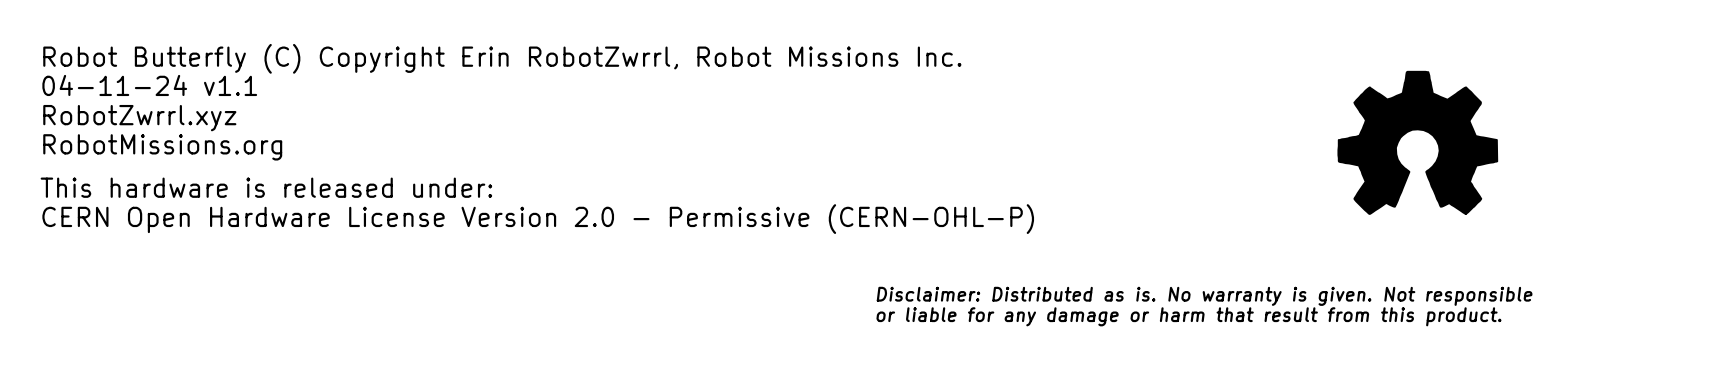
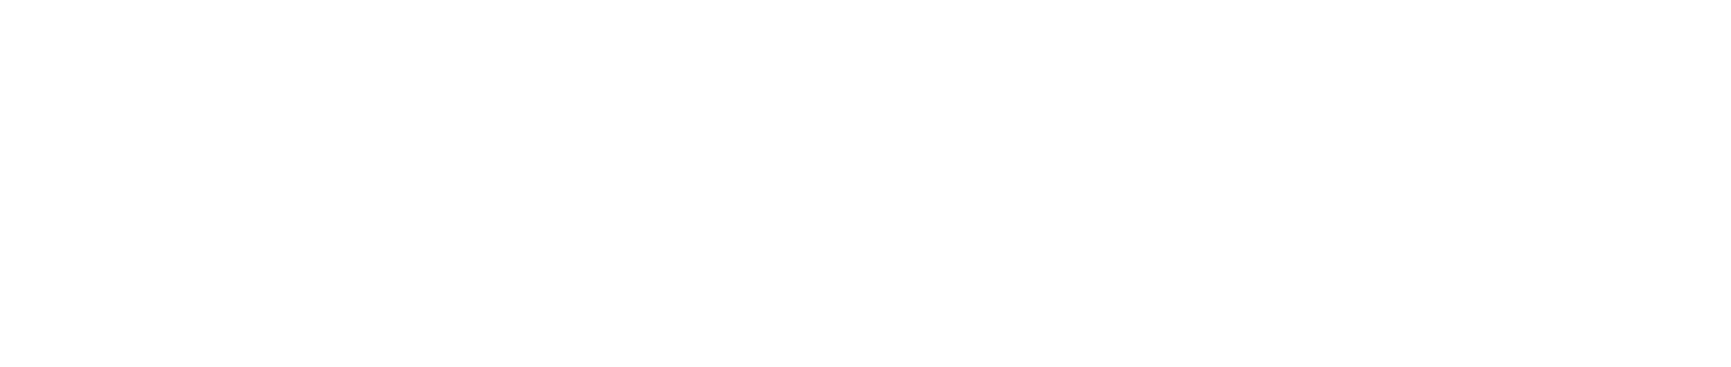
text: Robot Butterfly (C) Copyright Erin RobotZwrrl, Robot Missions Inc. (502, 58) -> none
text: 04-11-24 v1.1 (149, 85) -> none
text: RobotZwrrl.xyz (139, 118) -> none
power symbol: (1417, 142) -> none
text: RobotMissions.org (162, 147) -> none
text: This hardware is released under: (266, 187) -> none
text: CERN Open Hardware License Version 2.0 - Permissive (CERN-OHL-P) (538, 219) -> none
text: Disclaimer: Distributed as is. No warranty is given. Not responsible (1204, 296) -> none
text: or liable for any damage or harm that result from this product. (1188, 316) -> none

